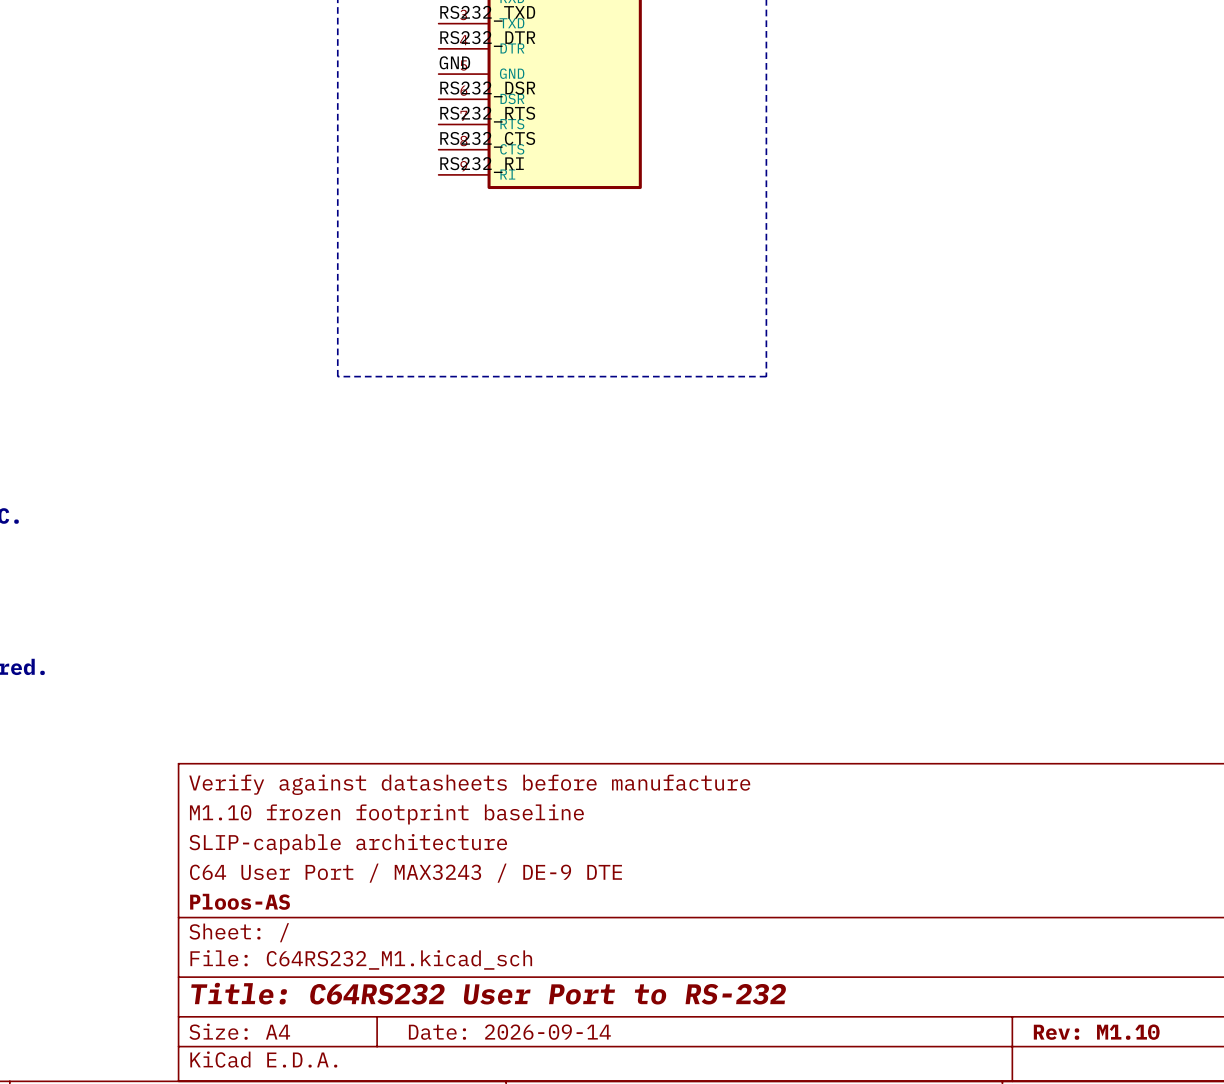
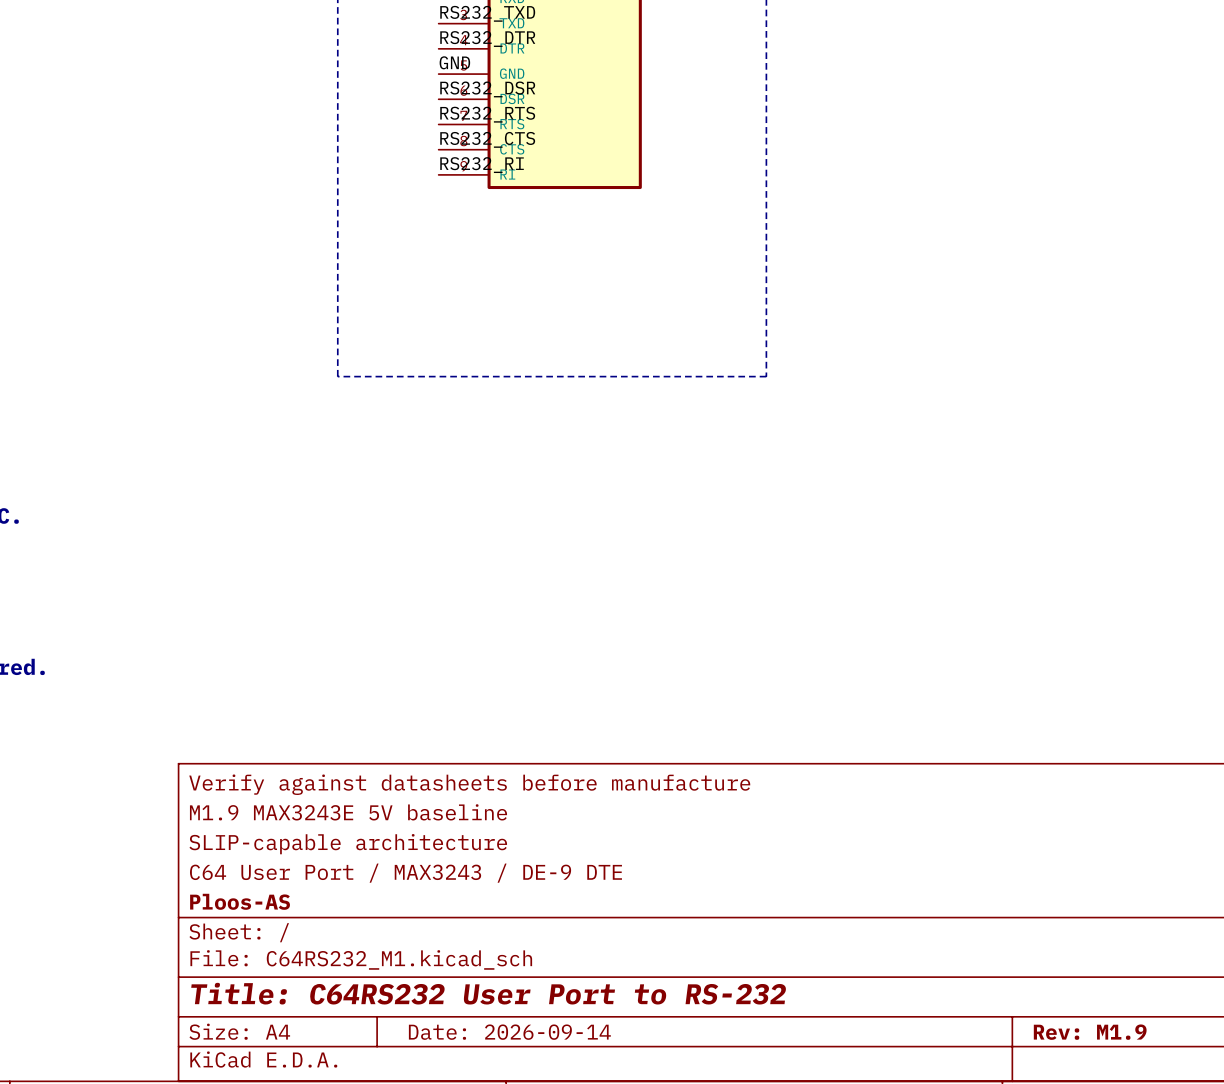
title block: M1.10 frozen footprint baseline (386, 814) -> M1.9 MAX3243E 5V baseline (348, 812)
title block: Rev: M1.10 (1096, 1032) -> Rev: M1.9 (1090, 1032)

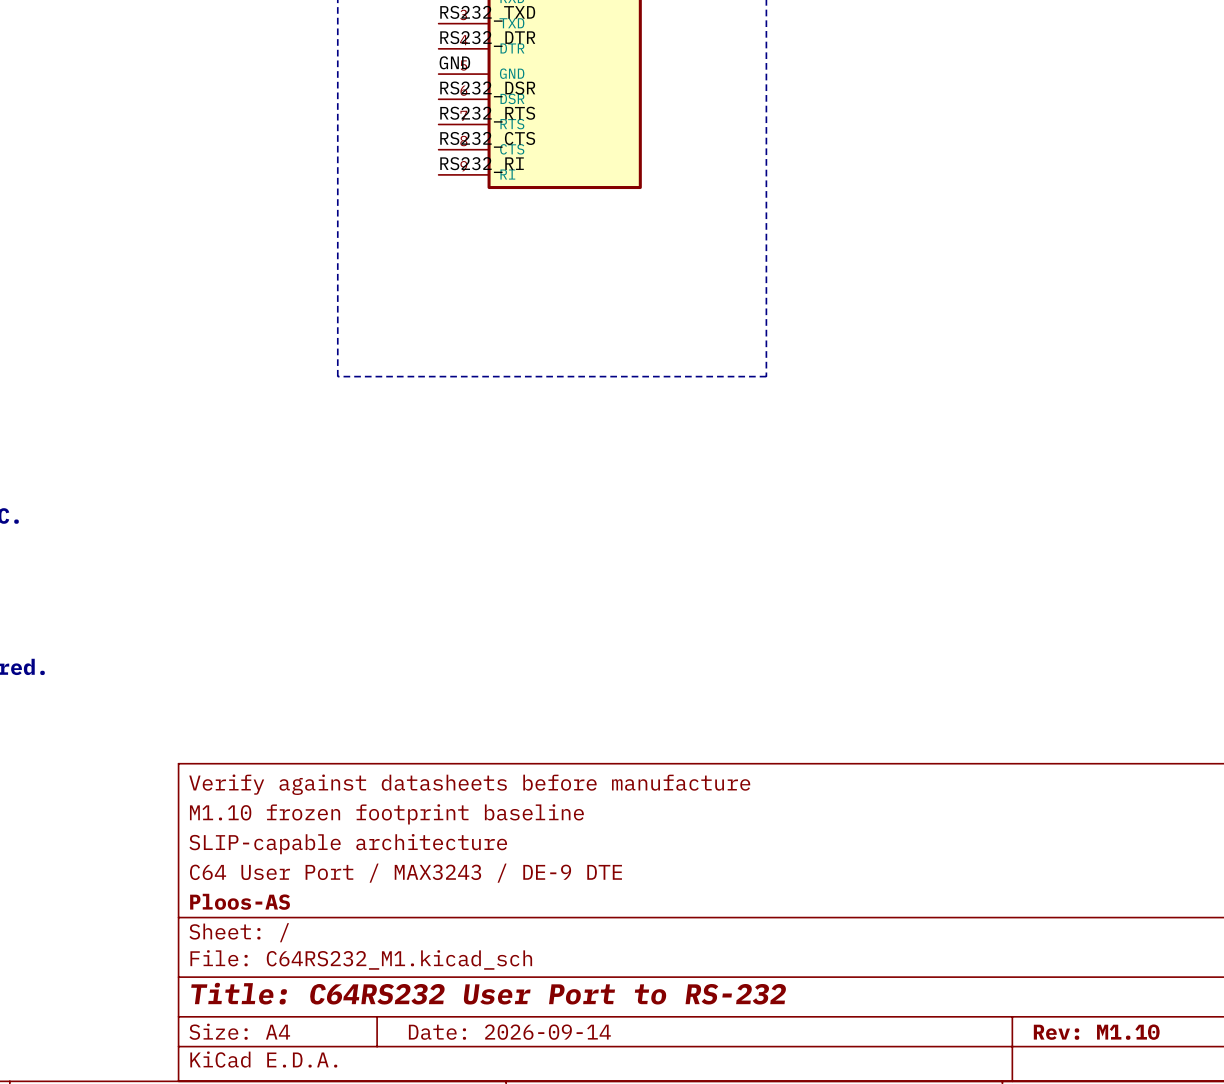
title block: M1.9 MAX3243E 5V baseline (348, 812) -> M1.10 frozen footprint baseline (386, 814)
title block: Rev: M1.9 (1090, 1032) -> Rev: M1.10 (1096, 1032)

